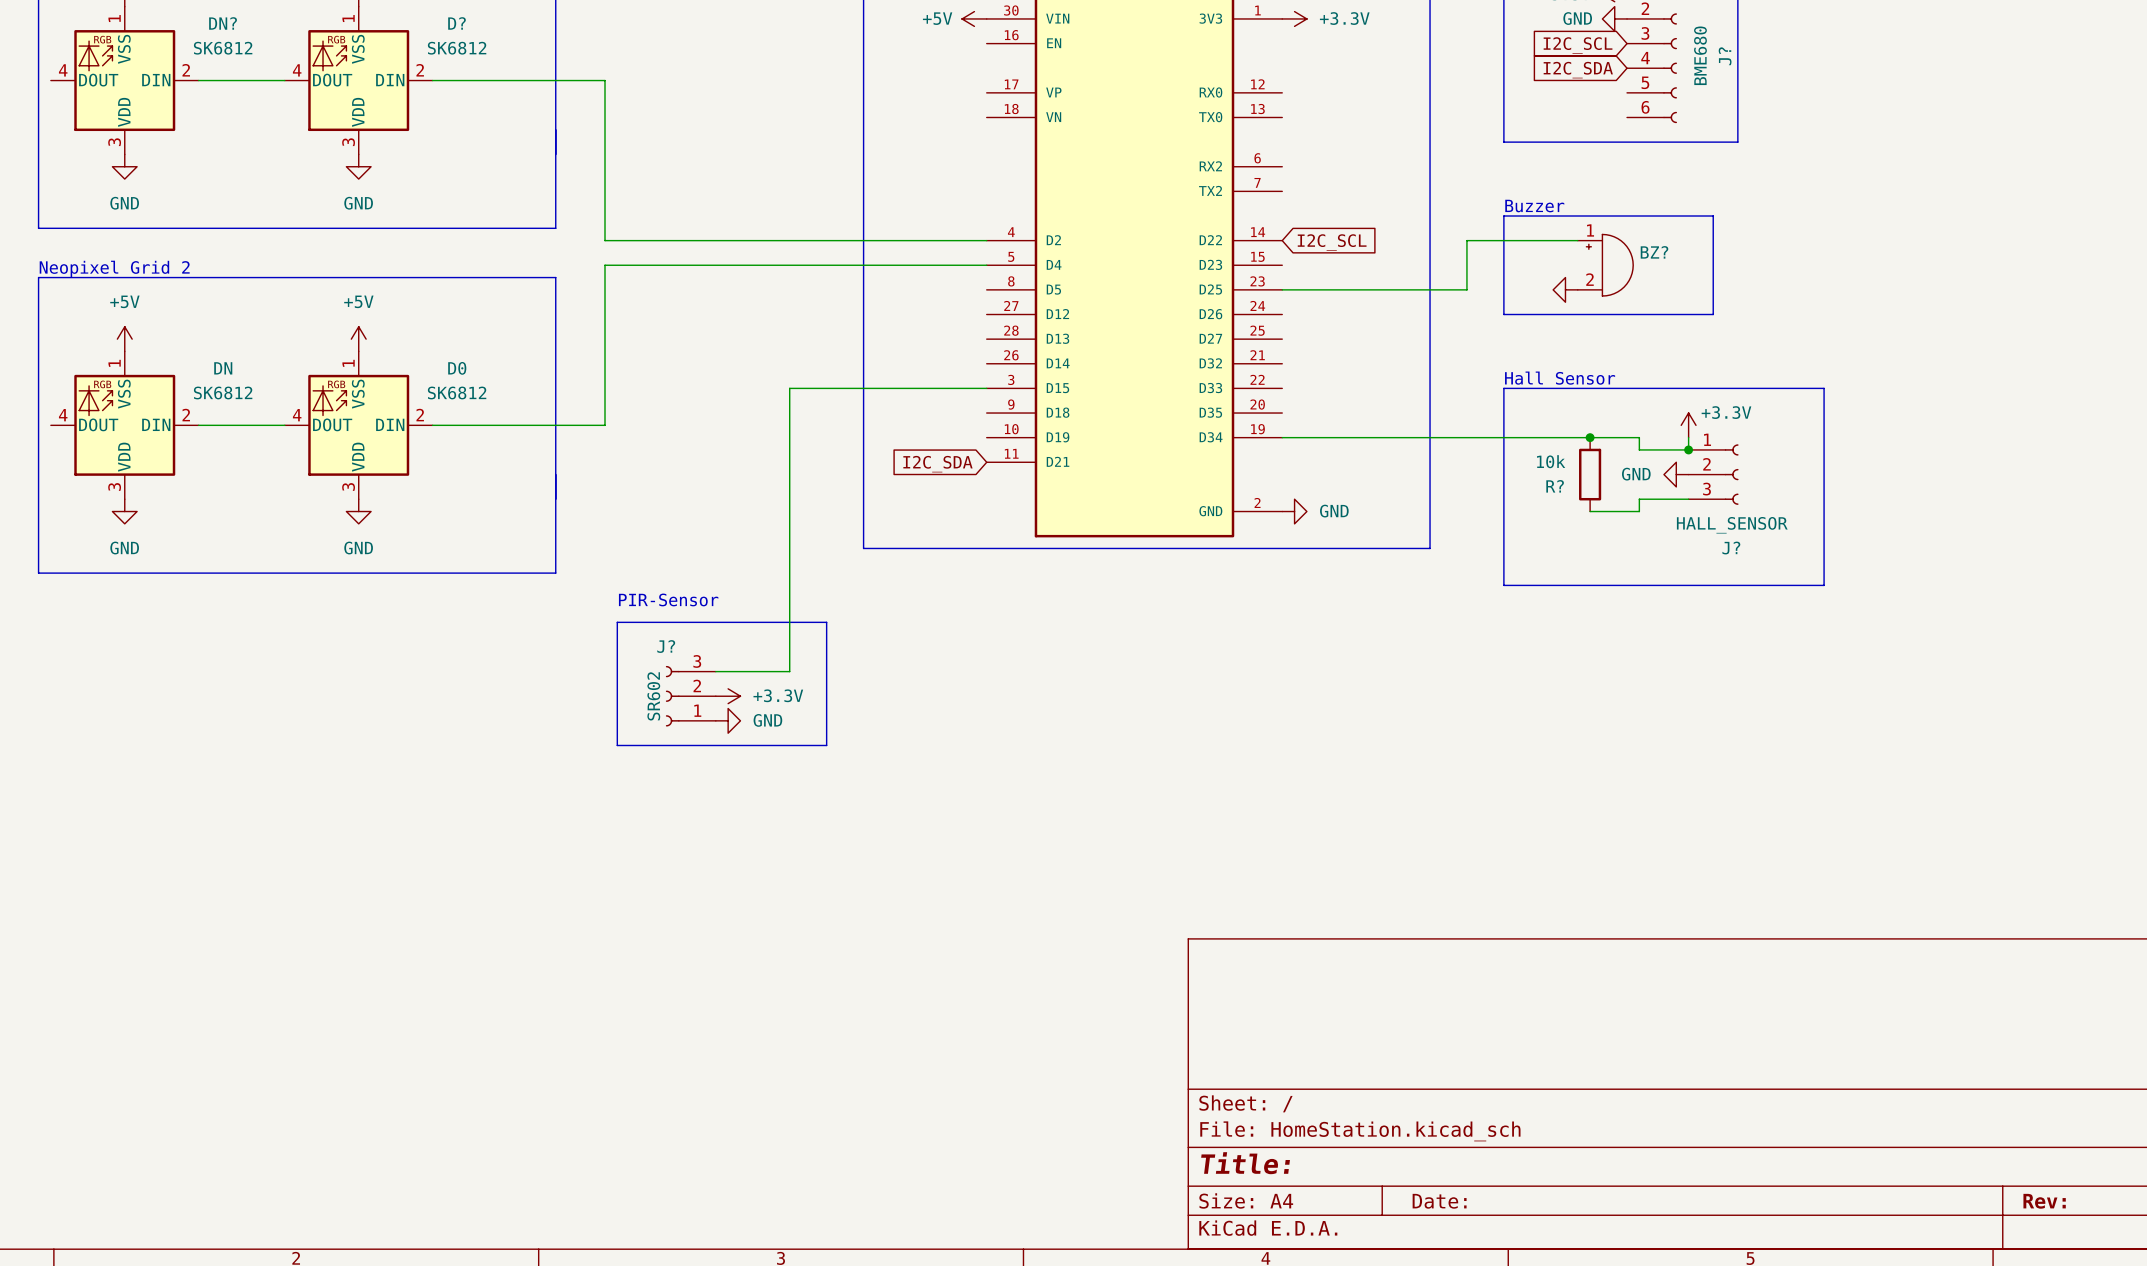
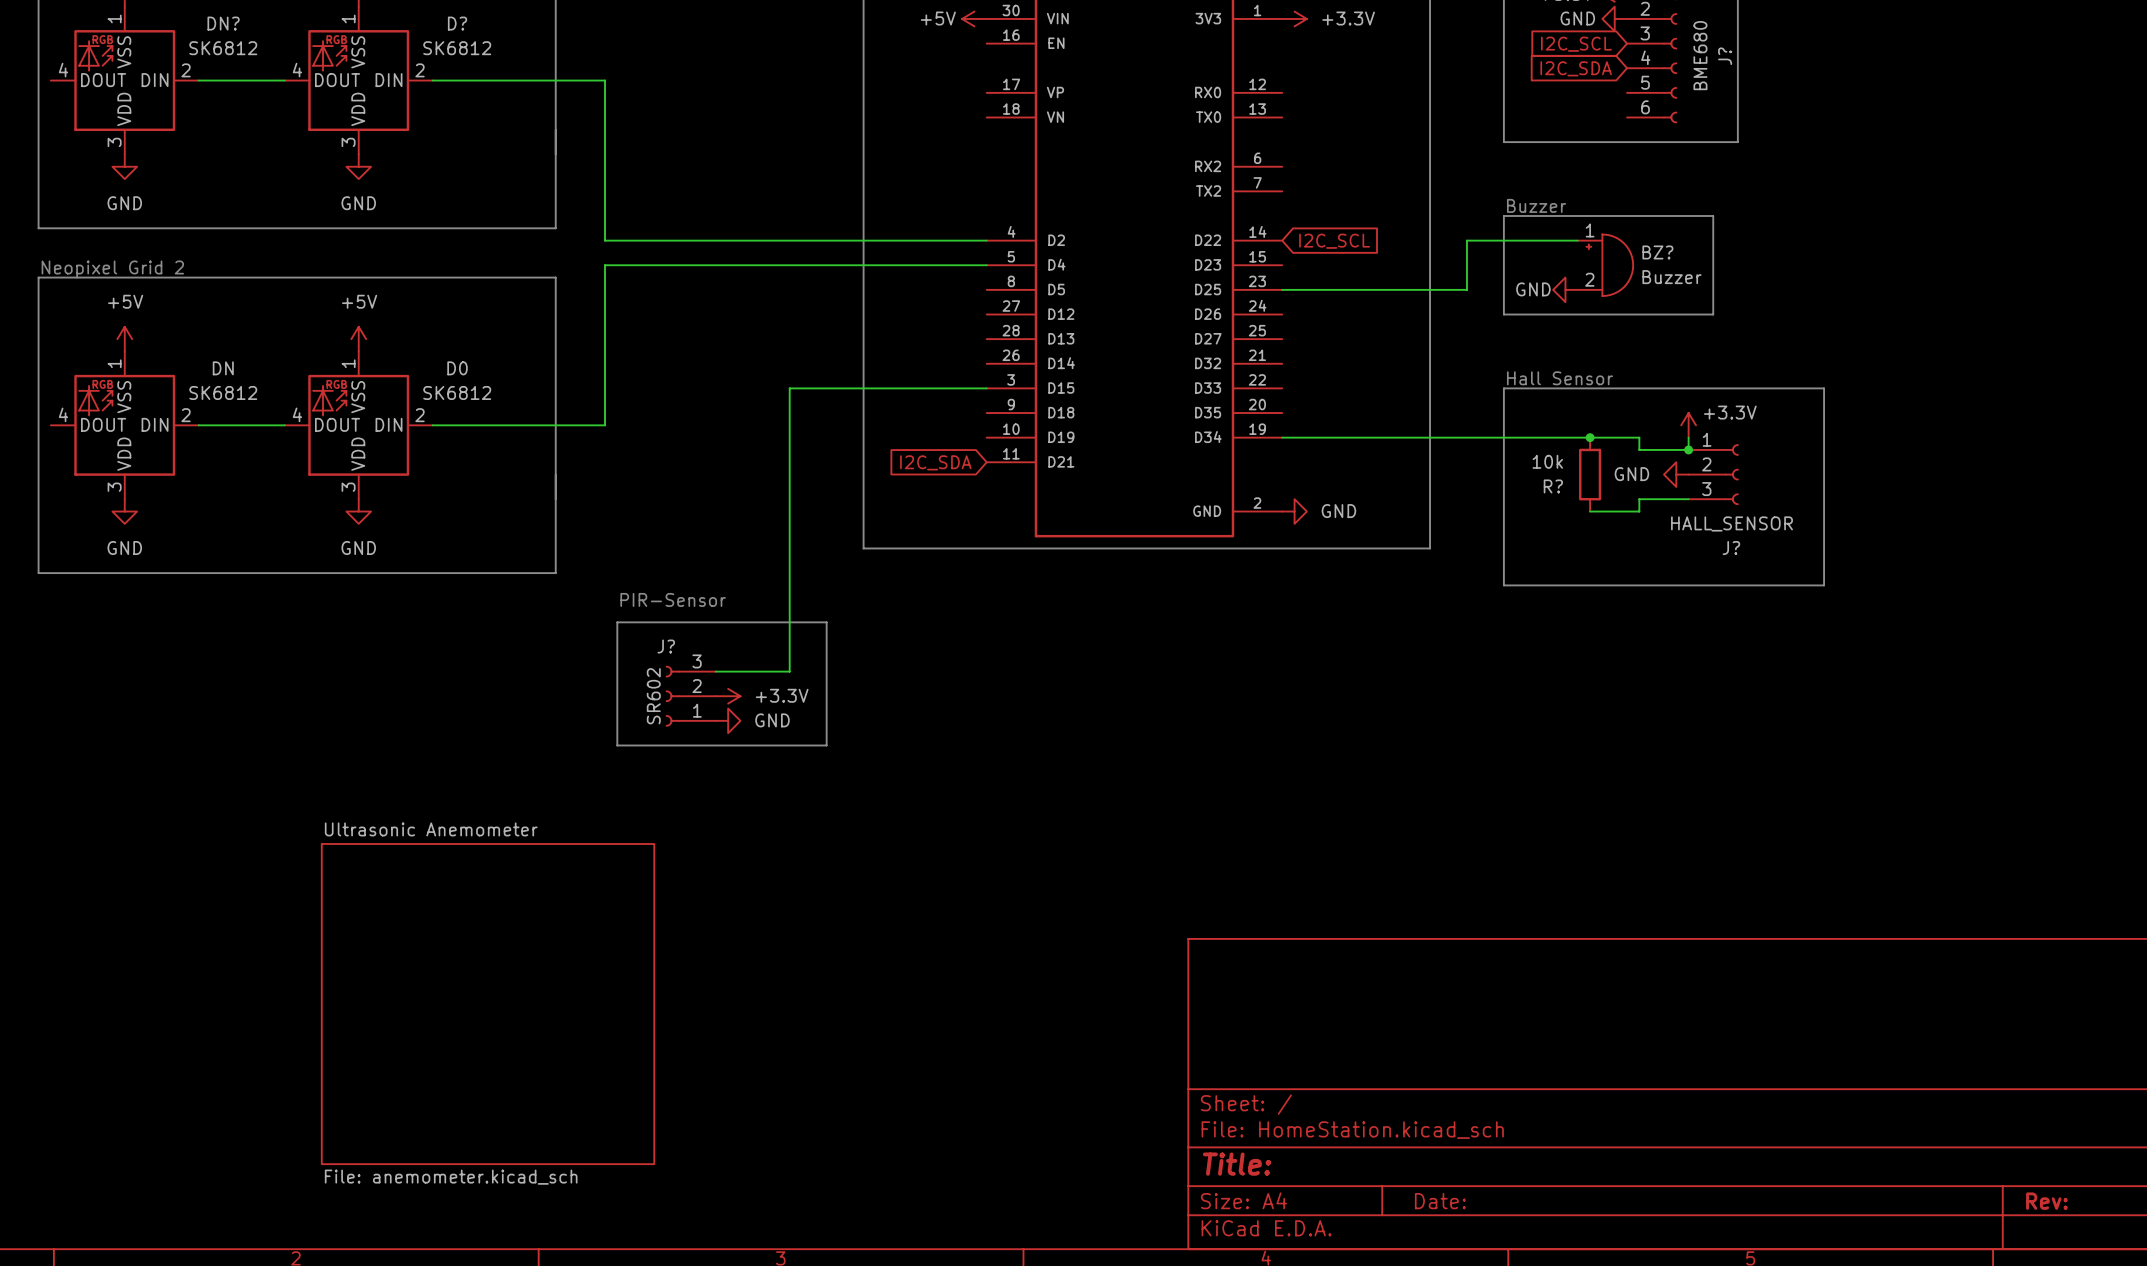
BZ? value: none -> Buzzer (1671, 277)
power symbol text: none -> GND (1533, 289)
sheet Ultrasonic Anemometer: none -> File: anemometer.kicad_sch (488, 1004)

